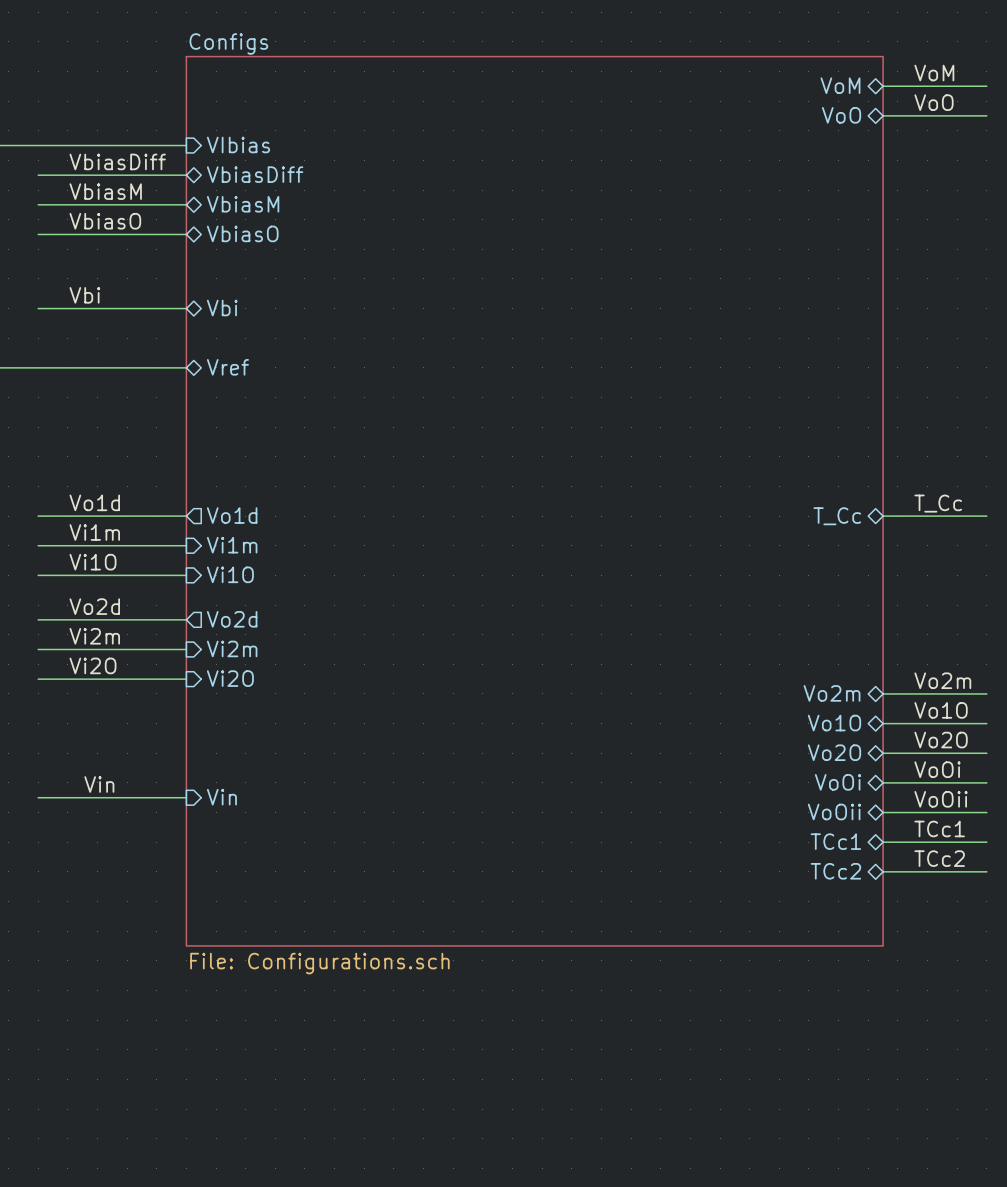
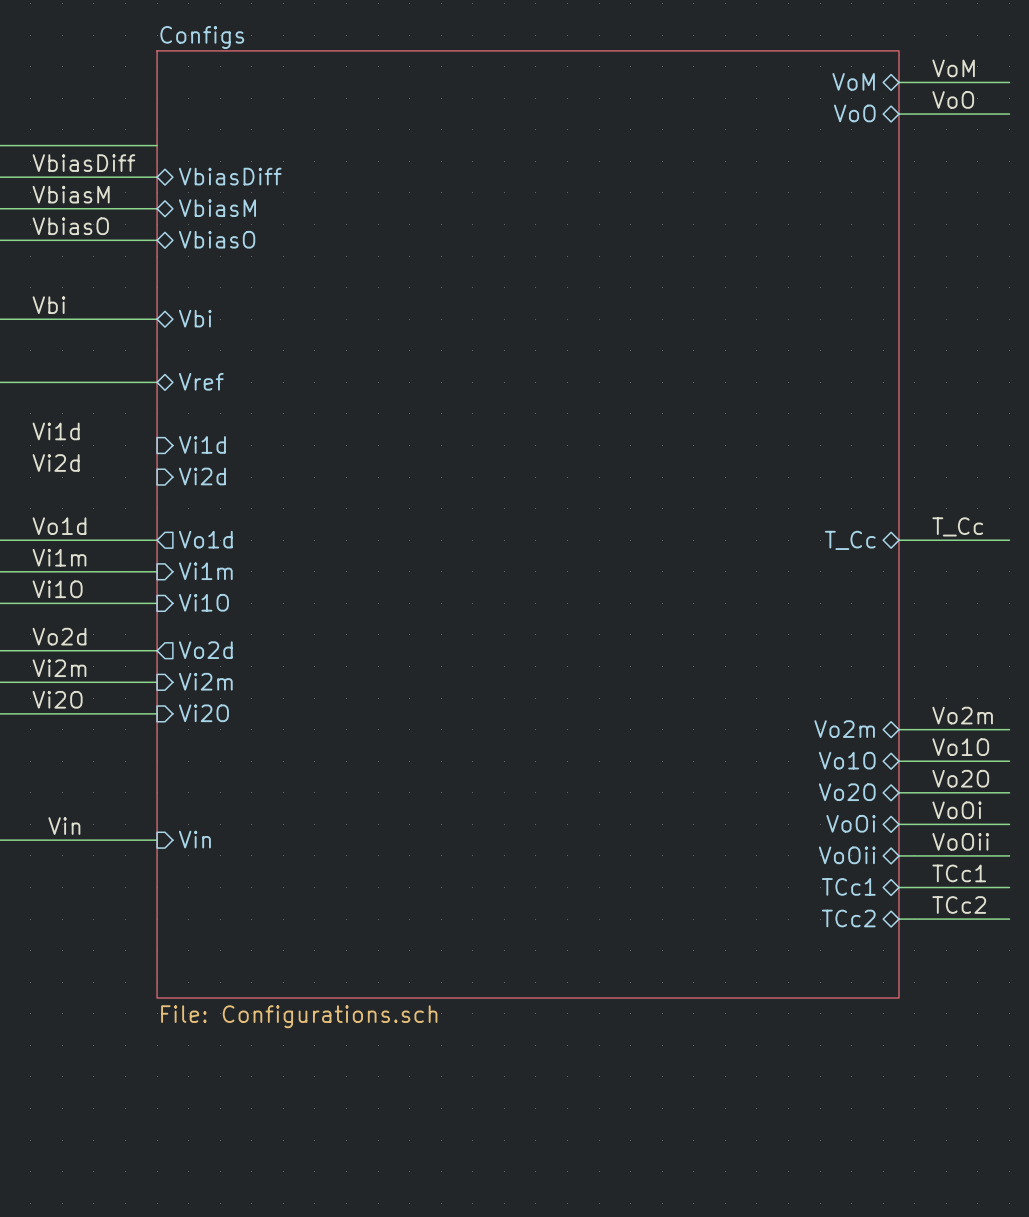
sheet pin: VIbias (238, 144) -> none
label: none -> Vi1d (56, 431)
sheet pin: none -> Vi1d (202, 444)
label: none -> Vi2d (56, 463)
sheet pin: none -> Vi2d (202, 476)

